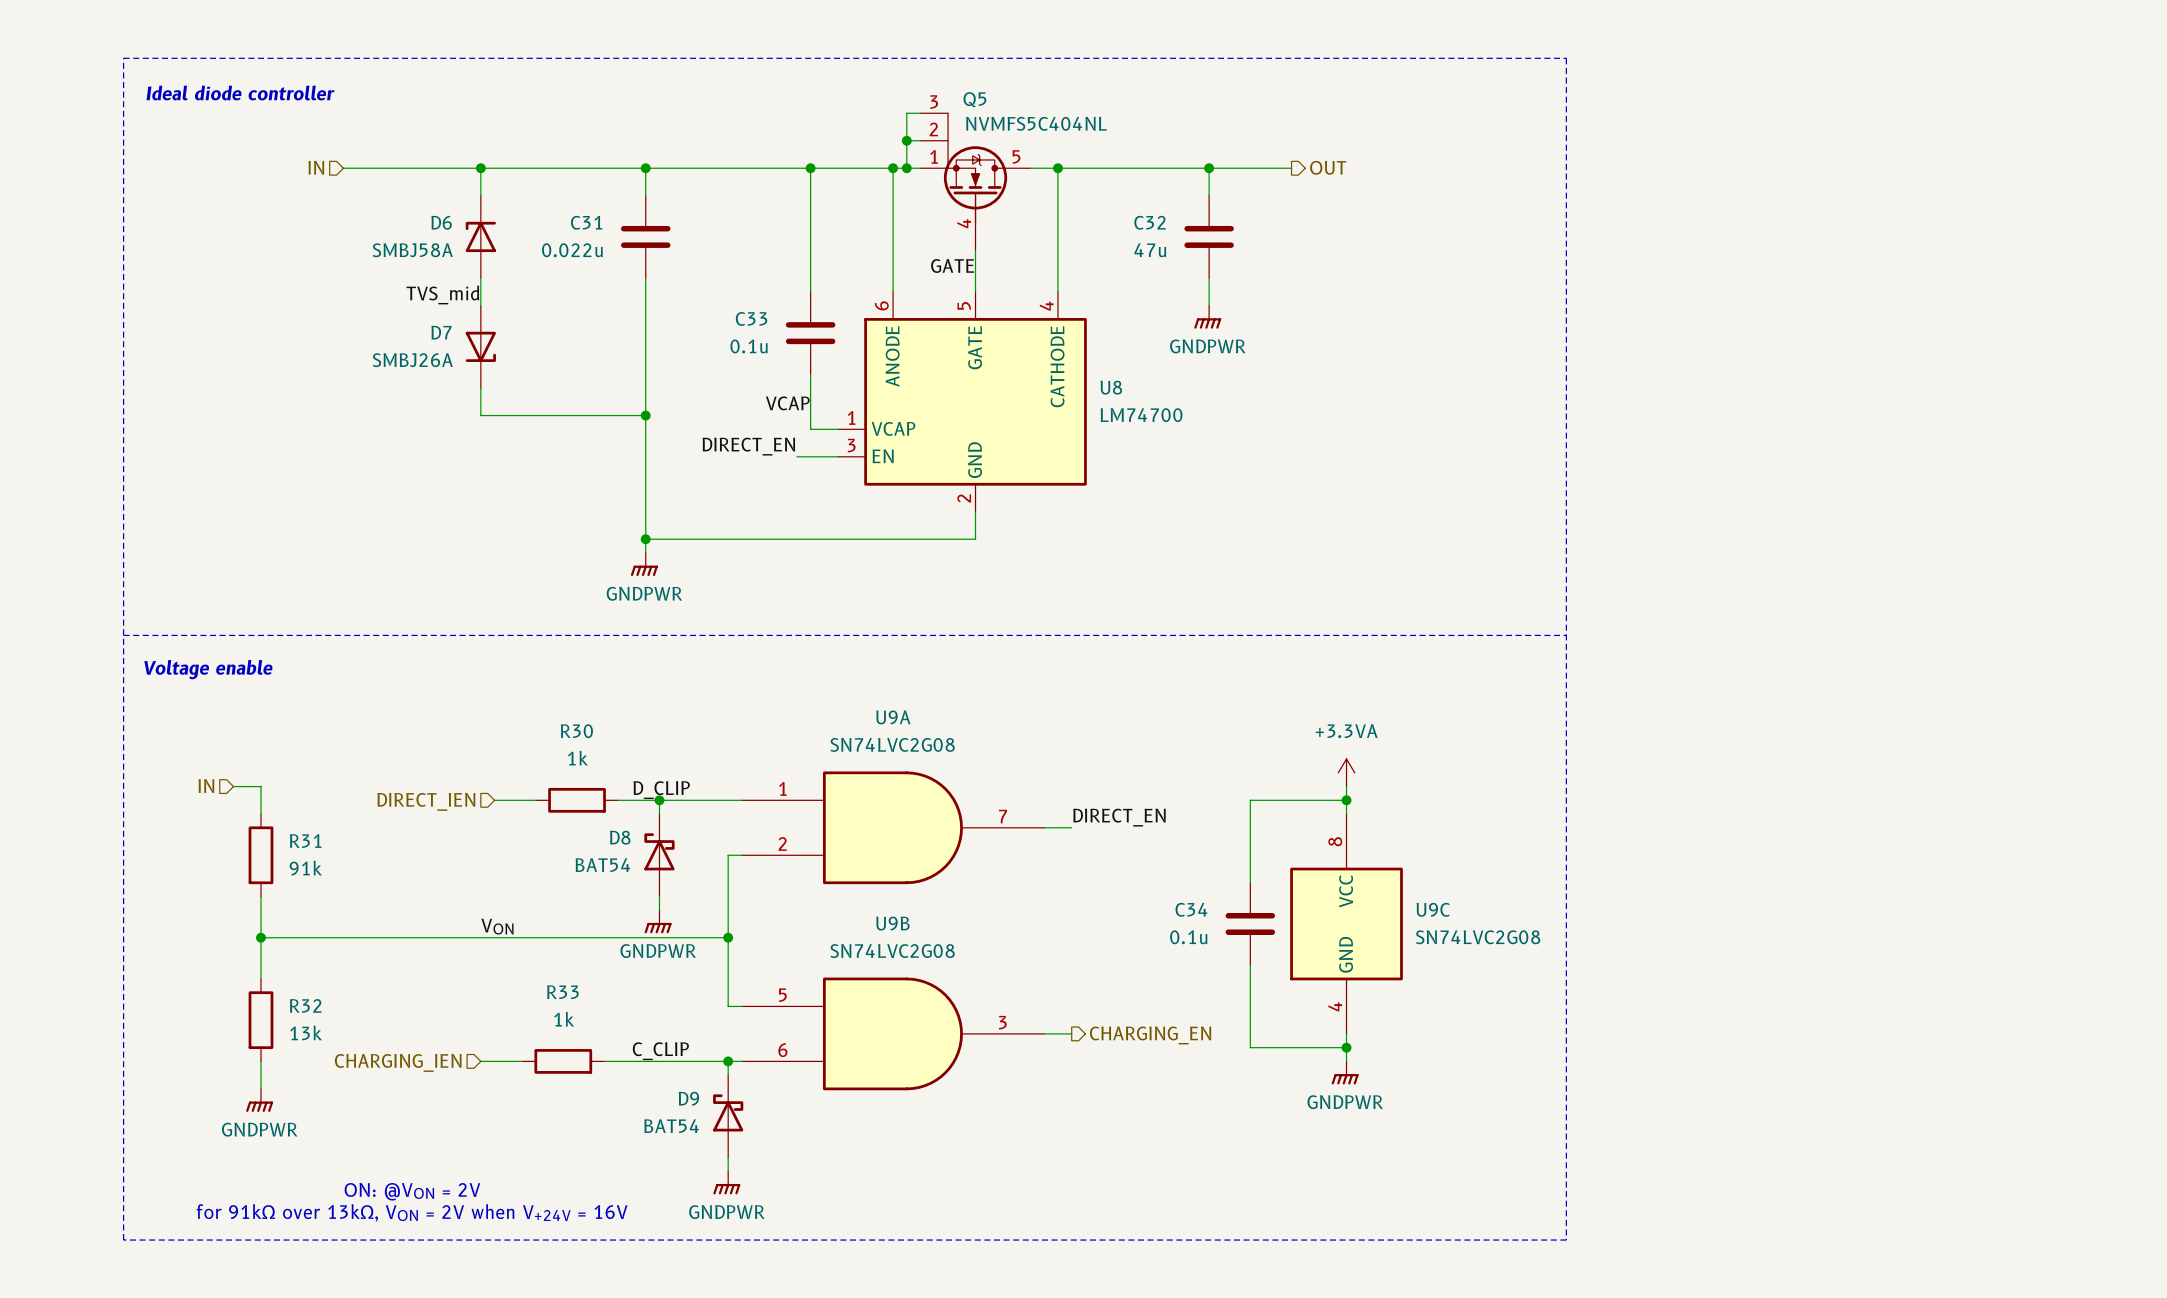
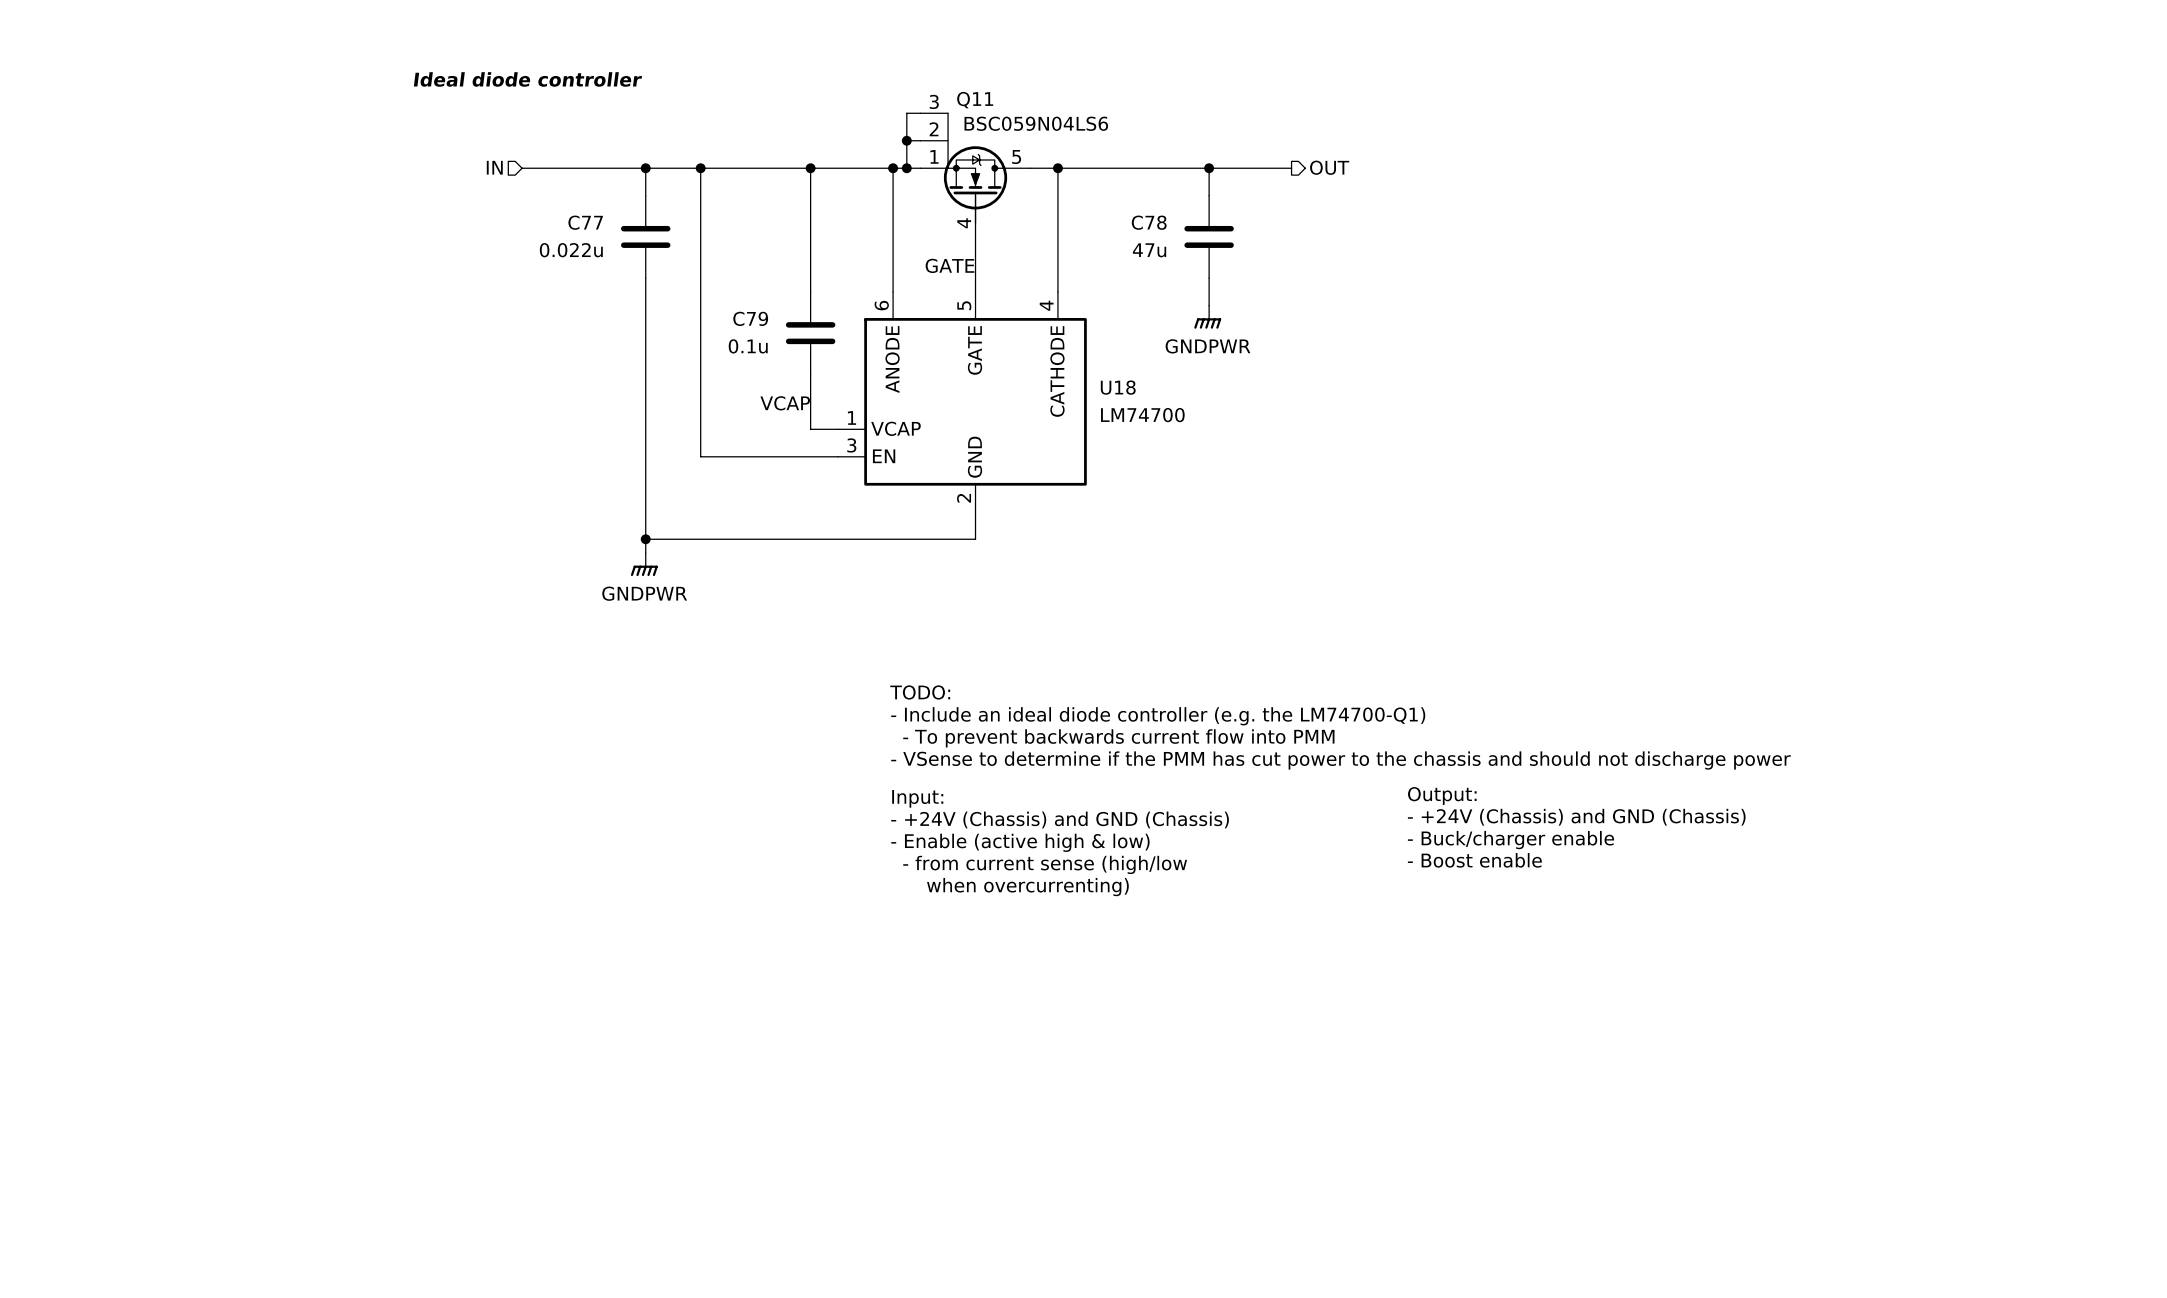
line: (123, 58) (1566, 58) (1566, 1240) (123, 1240) (123, 58) -> none
text position: Ideal diode controller (240, 92) -> Ideal diode controller (527, 79)
Q5 name: Q5 (974, 99) -> Q11 (975, 100)
Q5 value: NVMFS5C404NL (1036, 123) -> BSC059N04LS6 (1036, 123)
hierarchical label position: IN (316, 167) -> IN (494, 167)
wire: (343, 168) (522, 168) -> none
wire: (480, 168) (480, 195) -> none
junction: (480, 168) -> none
wire: none -> (700, 168) (700, 456) (796, 456)
junction: none -> (700, 168)
C31 name: C31 (586, 222) -> C77 (585, 222)
C32 name: C32 (1150, 222) -> C78 (1149, 222)
D6: SMBJ58A (480, 236) -> none
wire: (480, 278) (480, 305) -> none
label: TVS_mid (442, 294) -> none
C33 name: C33 (751, 318) -> C79 (750, 318)
D7: SMBJ26A (480, 346) -> none
U8 name: U8 (1111, 387) -> U18 (1118, 387)
wire: (480, 388) (480, 415) (645, 415) -> none
junction: (645, 415) -> none
label: DIRECT_EN (748, 446) -> none
line: (123, 635) (1566, 635) -> none
text: Voltage enable (208, 669) -> none
text: none -> TODO: (920, 692)
text: none -> - Include an ideal diode controller (e.g. the LM74700-Q1) (1158, 716)
text: none -> - To prevent backwards current flow into PMM (1118, 738)
text: none -> - VSense to determine if the PMM has cut power to the chassis and should not discharge power (1340, 760)
power symbol: +3.3VA (1346, 772) -> none
hierarchical label: IN (206, 786) -> none
wire: (233, 786) (260, 786) (260, 814) -> none
wire: (1346, 786) (1346, 814) -> none
label: D_CLIP (661, 790) -> none
text: none -> Output: (1442, 795)
text: none -> Input: (917, 798)
wire: (494, 800) (535, 800) -> none
R30: 1k (577, 800) -> none
wire: (618, 800) (741, 800) -> none
wire: (659, 800) (659, 814) -> none
junction: (659, 800) -> none
wire: (1346, 800) (1250, 800) (1250, 882) -> none
junction: (1346, 800) -> none
hierarchical label: DIRECT_IEN (426, 801) -> none
label: DIRECT_EN (1119, 817) -> none
text: none -> - +24V (Chassis) and GND (Chassis) (1576, 817)
text: none -> - +24V (Chassis) and GND (Chassis) (1060, 819)
U9A: SN74LVC2G08 (893, 827) -> none
wire: (1044, 827) (1071, 827) -> none
text: none -> - Buck/charger enable (1510, 840)
text: none -> - Enable (active high & low) (1020, 842)
R31: 91k (260, 855) -> none
D8: BAT54 (659, 855) -> none
wire: (741, 855) (728, 855) (728, 1006) (741, 1006) -> none
text: none -> - Boost enable (1474, 860)
text: none -> - from current sense (high/low (1045, 864)
text: none -> when overcurrenting) (1027, 887)
wire: (260, 896) (260, 978) -> none
wire: (659, 896) (659, 910) -> none
power symbol: GNDPWR (658, 921) -> none
C34: 0.1u (1250, 923) -> none
U9C: SN74LVC2G08 (1346, 923) -> none
label: VON (497, 926) -> none
wire: (260, 937) (728, 937) -> none
junction: (260, 937) -> none
junction: (728, 937) -> none
wire: (1250, 965) (1250, 1047) (1346, 1047) -> none
R32: 13k (260, 1020) -> none
U9B: SN74LVC2G08 (893, 1033) -> none
wire: (1044, 1033) (1071, 1033) -> none
wire: (1346, 1033) (1346, 1061) -> none
hierarchical label: CHARGING_EN (1150, 1035) -> none
junction: (1346, 1047) -> none
label: C_CLIP (660, 1051) -> none
wire: (260, 1061) (260, 1088) -> none
wire: (480, 1061) (522, 1061) -> none
R33: 1k (563, 1061) -> none
wire: (604, 1061) (741, 1061) -> none
wire: (728, 1061) (728, 1075) -> none
junction: (728, 1061) -> none
hierarchical label: CHARGING_IEN (398, 1062) -> none
power symbol: GNDPWR (1345, 1072) -> none
power symbol: GNDPWR (259, 1100) -> none
D9: BAT54 (728, 1116) -> none
wire: (728, 1157) (728, 1171) -> none
power symbol: GNDPWR (726, 1182) -> none
text: ON: @VON = 2V (412, 1191) -> none
text: for 91kΩ over 13kΩ, VON = 2V when V+24V = 16V (412, 1212) -> none

